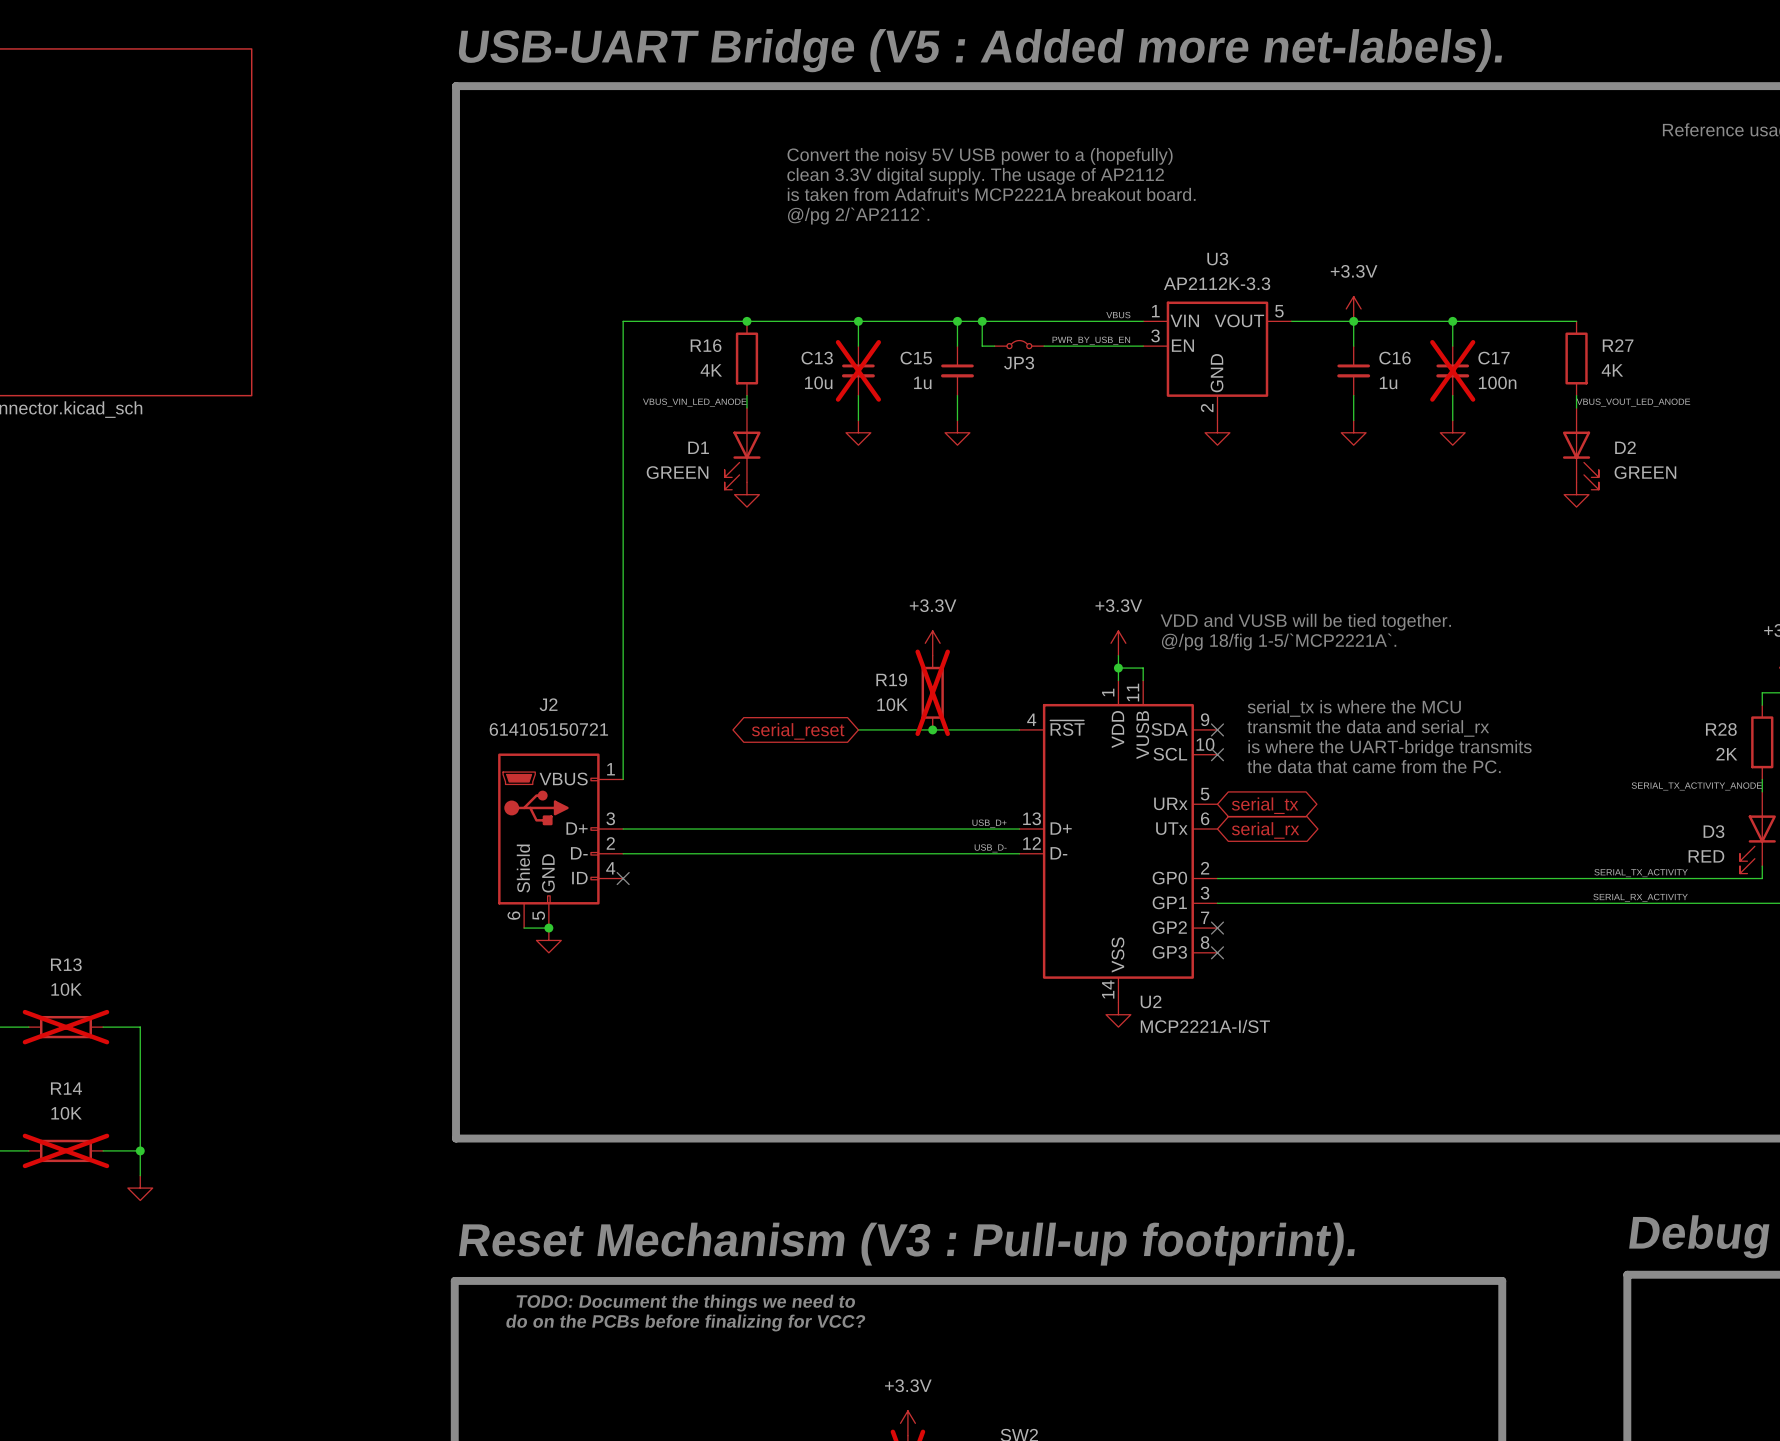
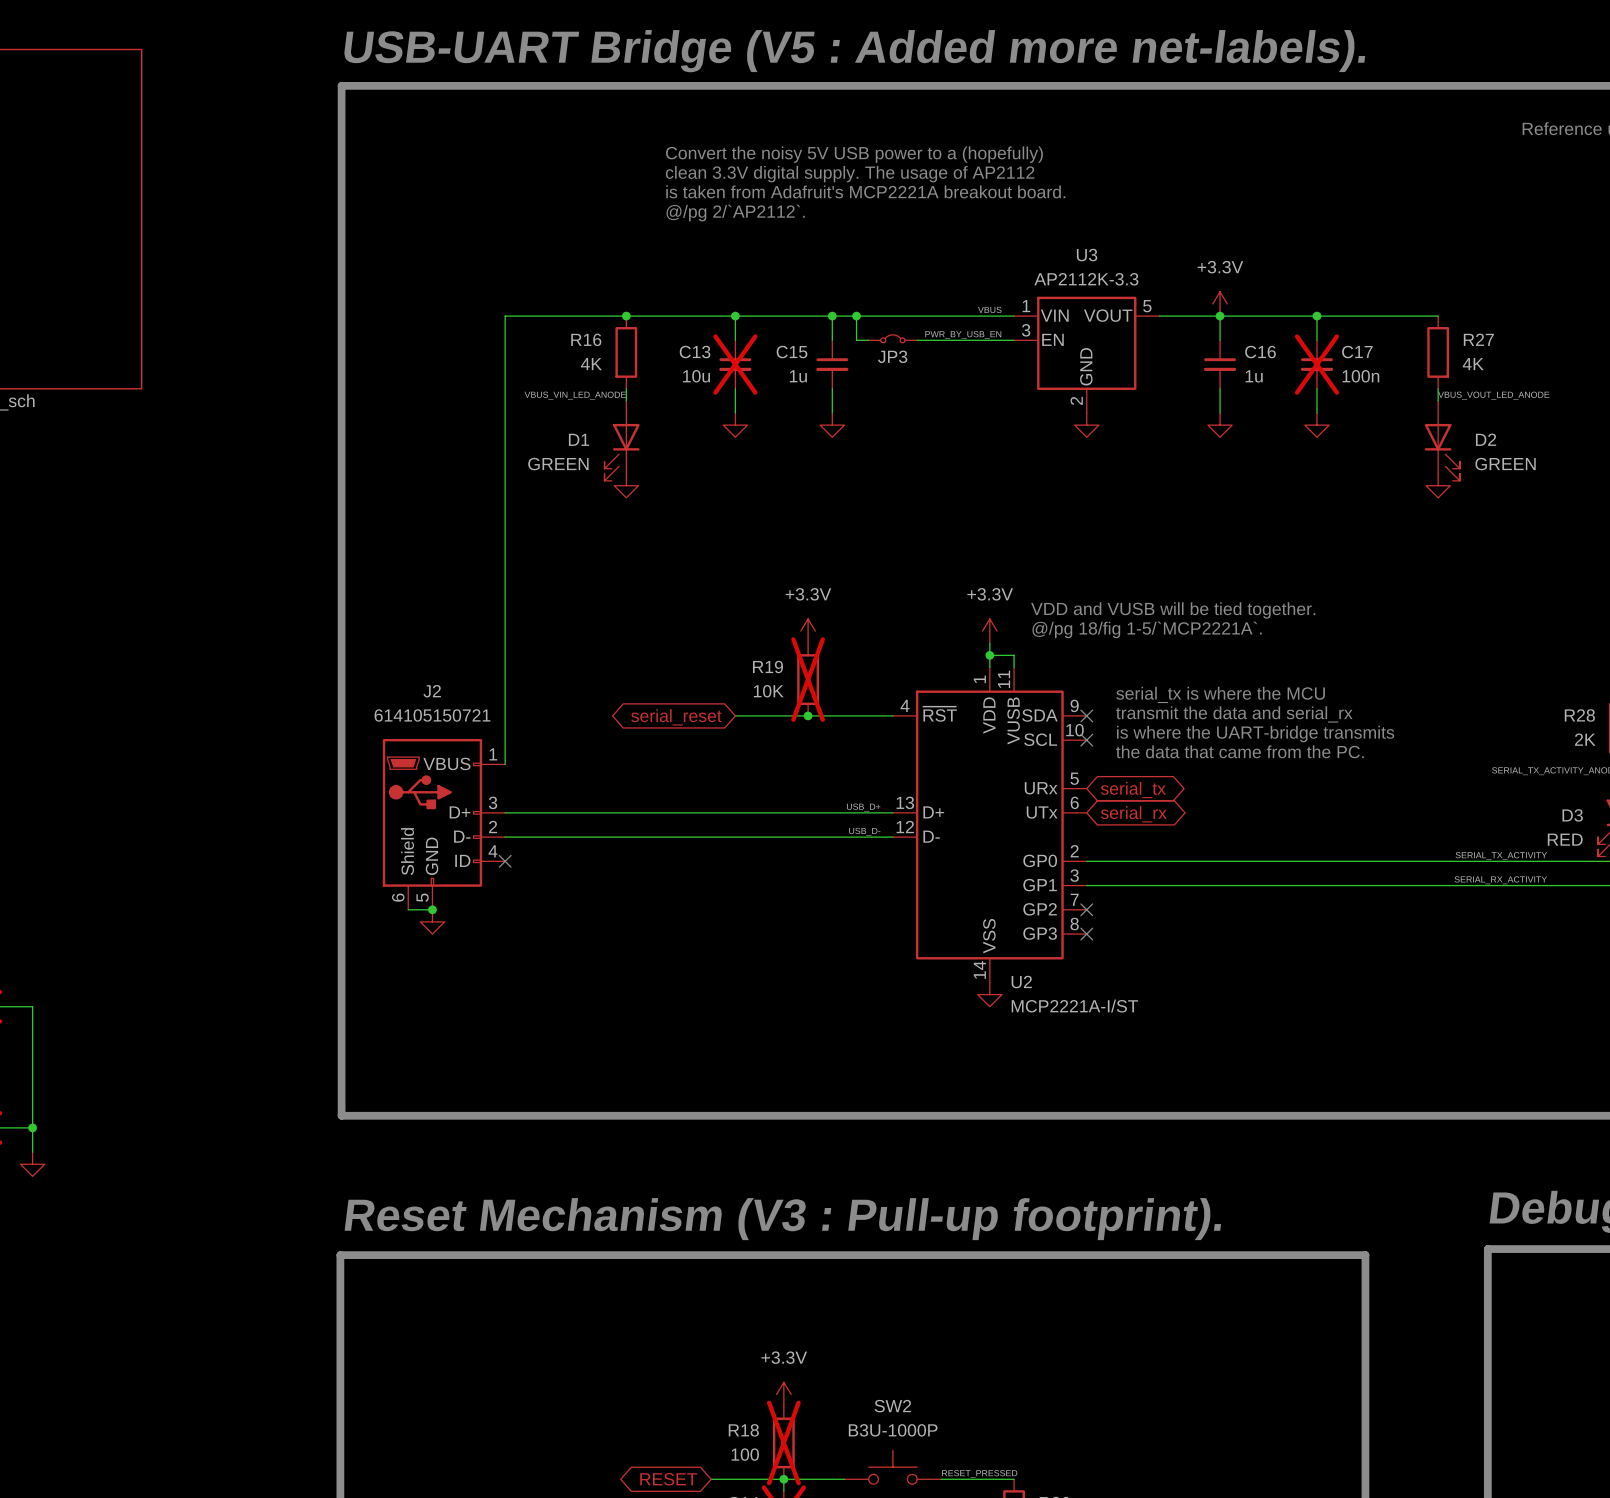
text: TODO: Document the things we need to (685, 1303) -> none
text: do on the PCBs before finalizing for VCC? (685, 1323) -> none

